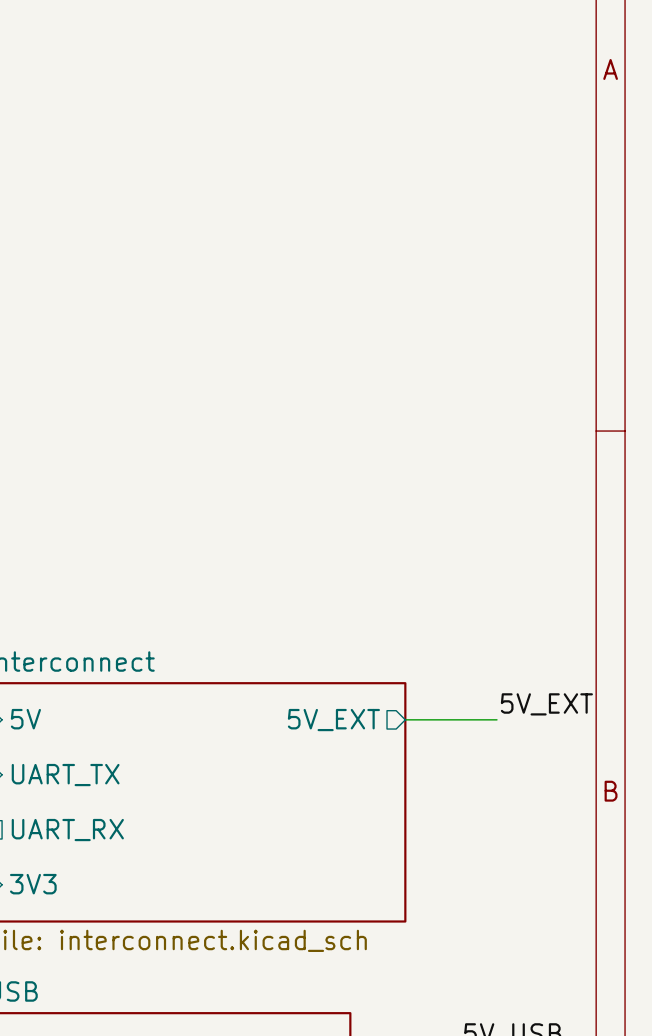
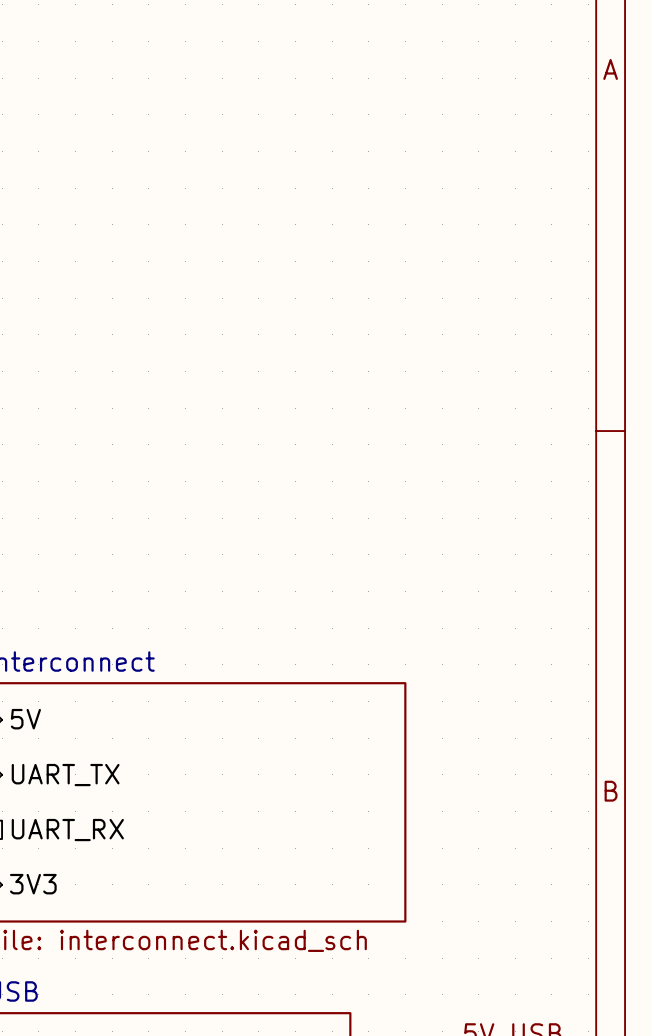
label: 5V_EXT (546, 704) -> none
wire: (405, 719) (497, 719) -> none
sheet pin: 5V_EXT (333, 720) -> none

